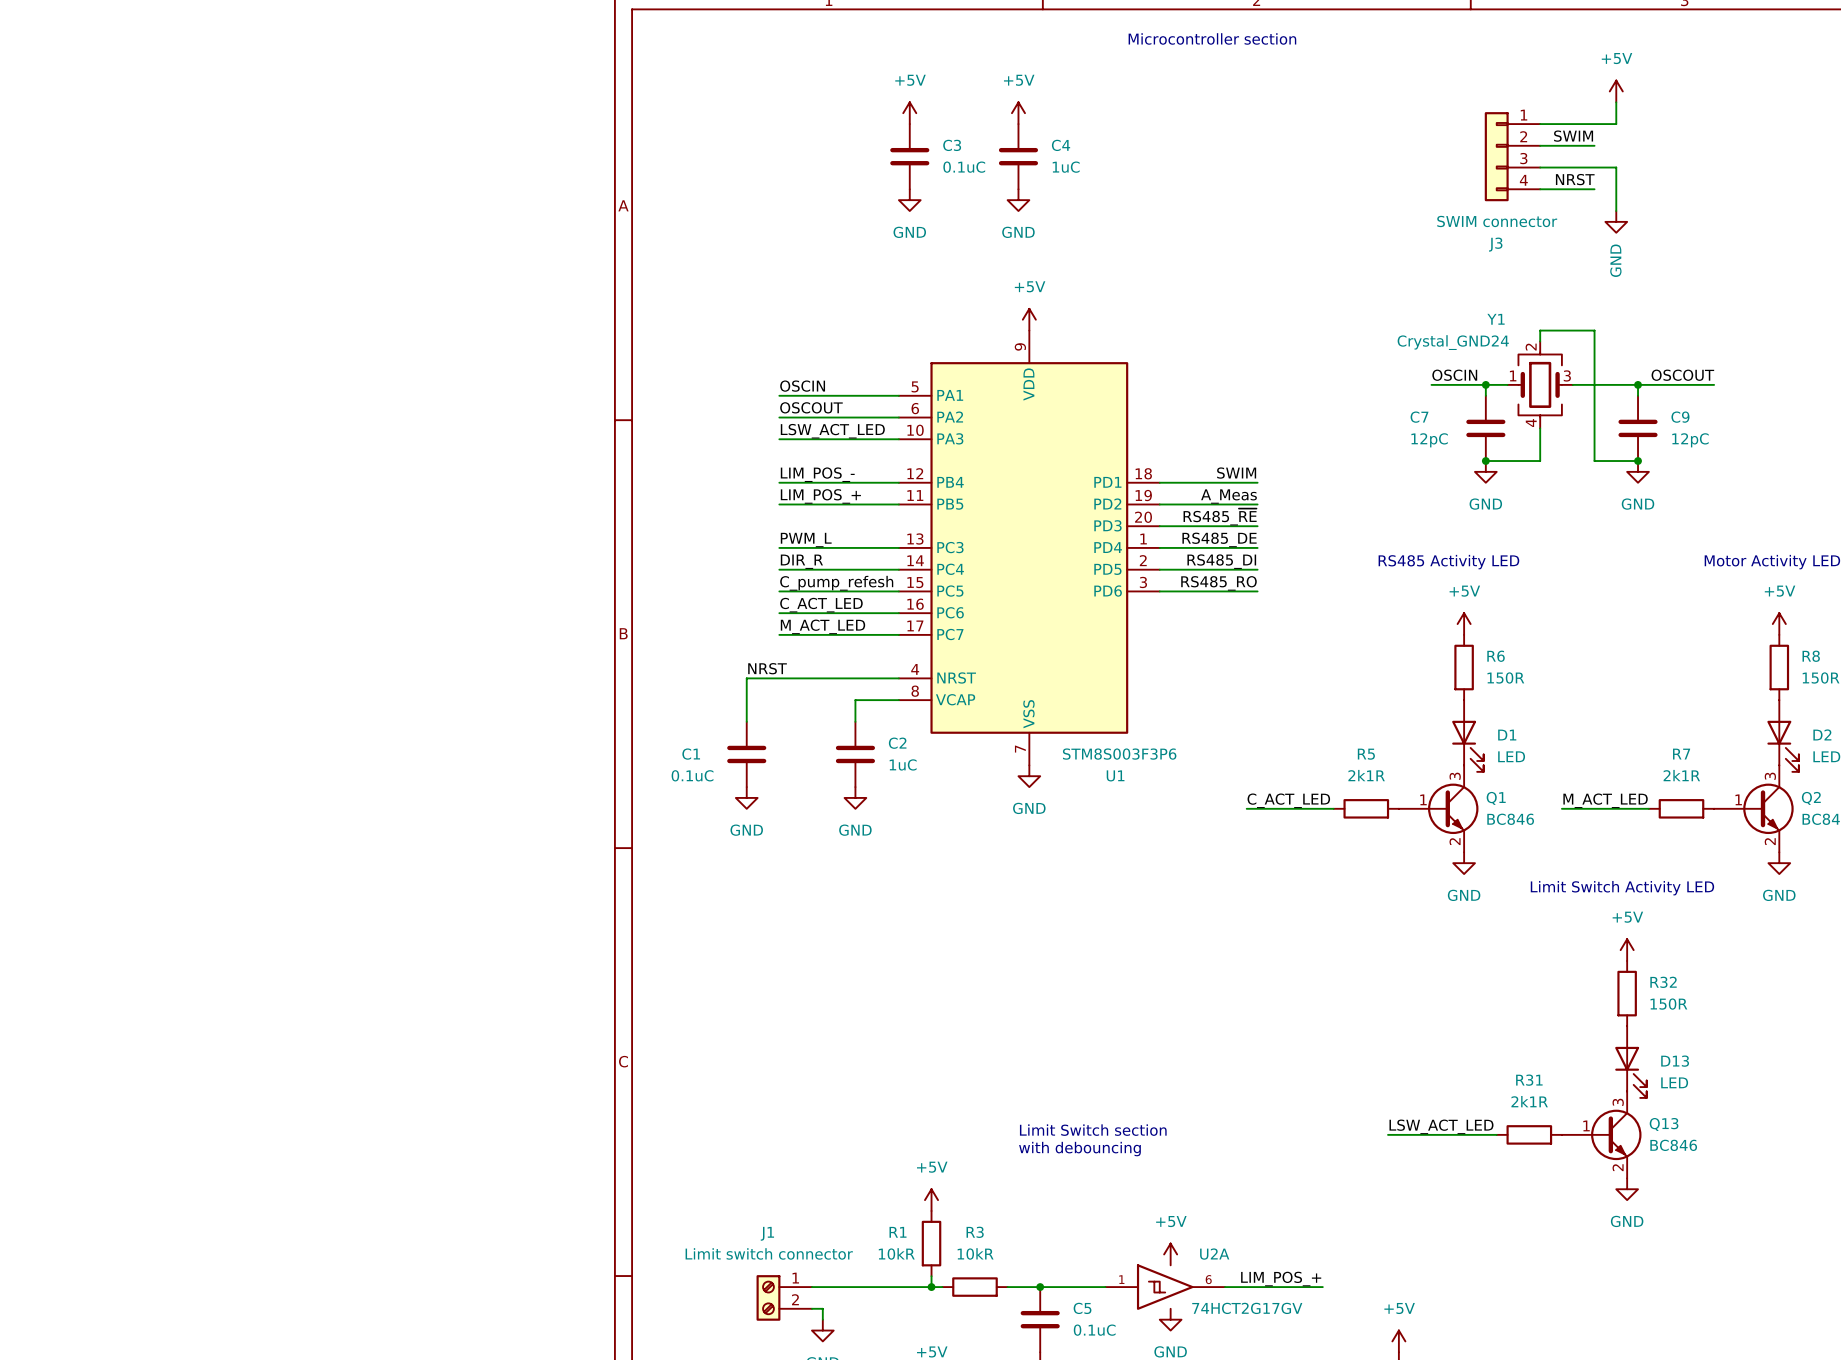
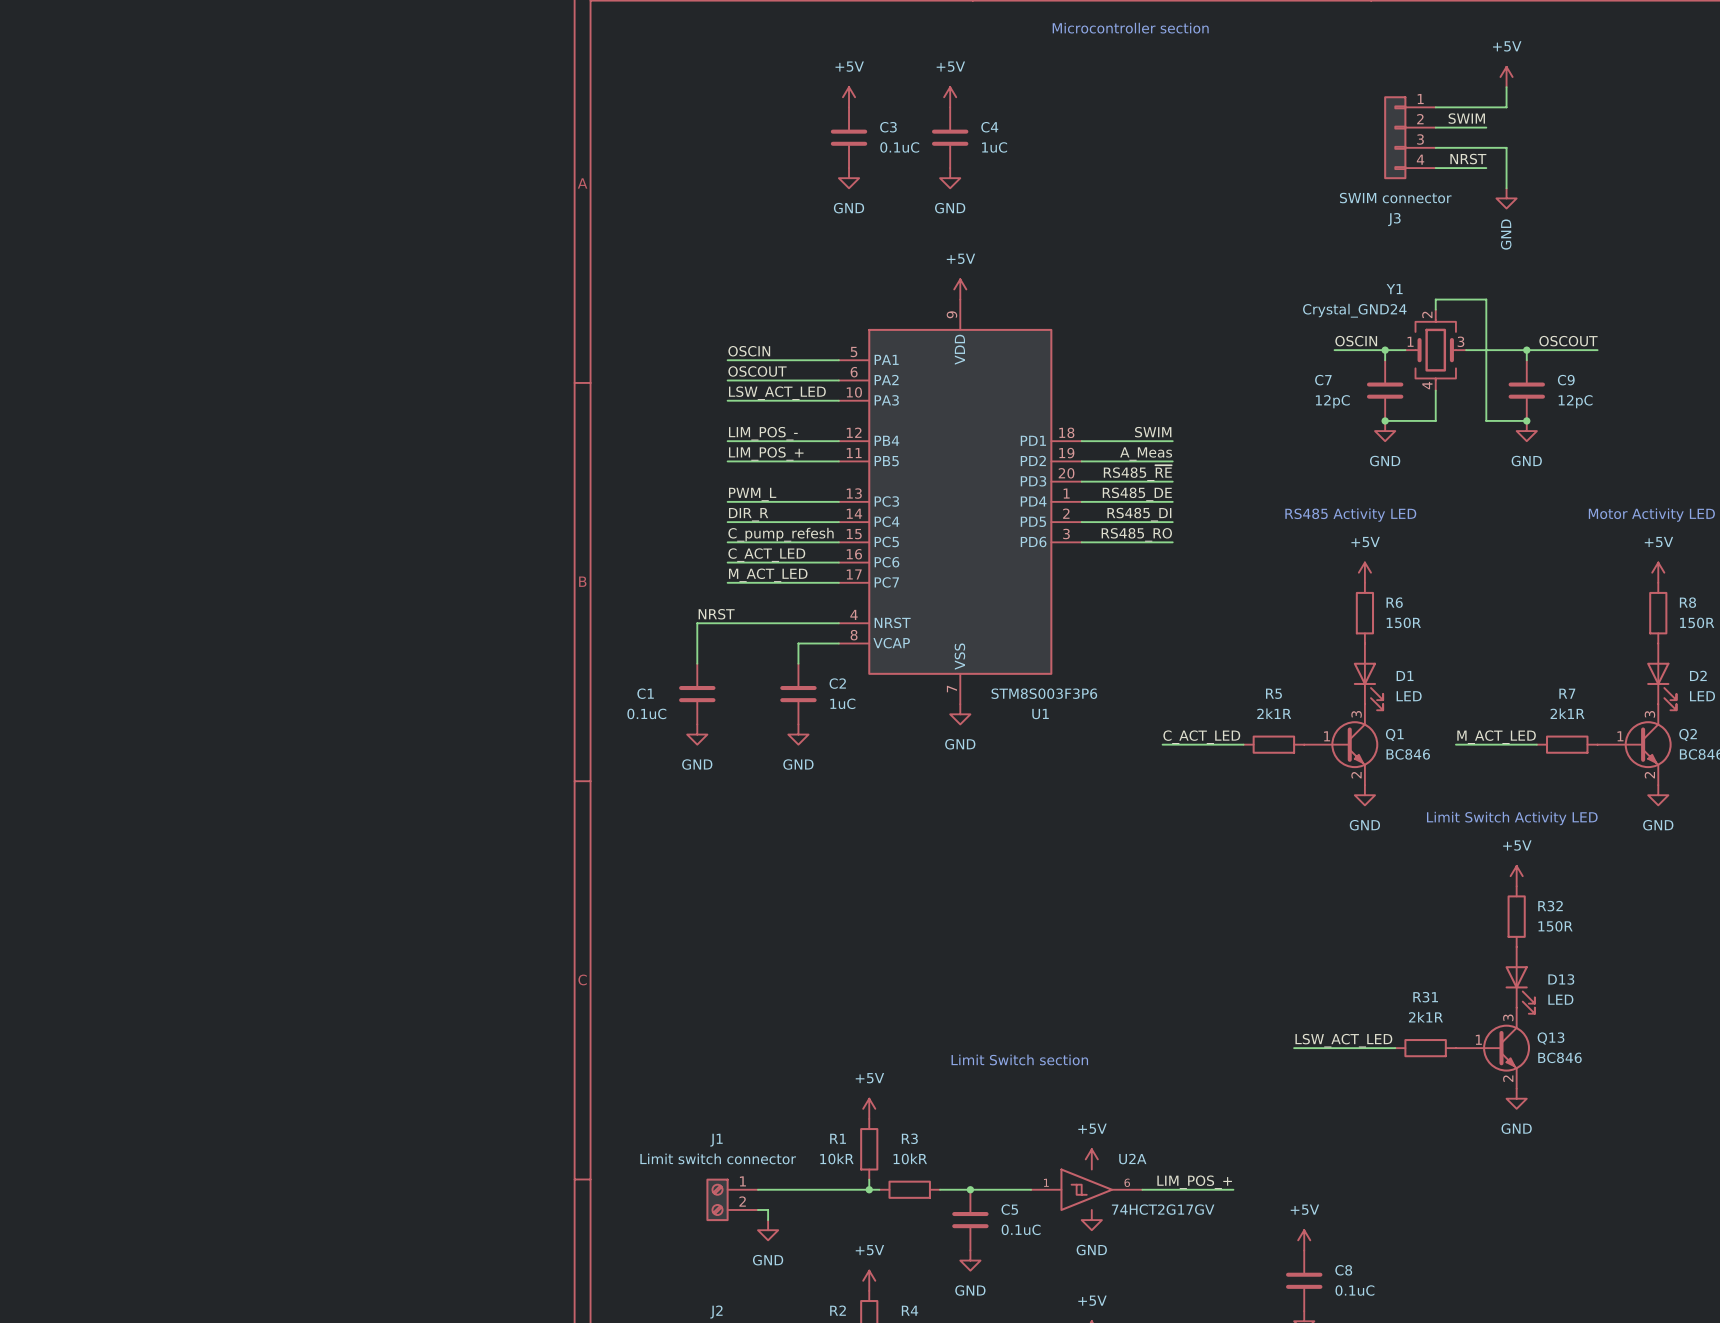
text: Limit Switch section (1093, 1130) -> none
text: with debouncing (1079, 1149) -> Limit Switch section (1019, 1059)

